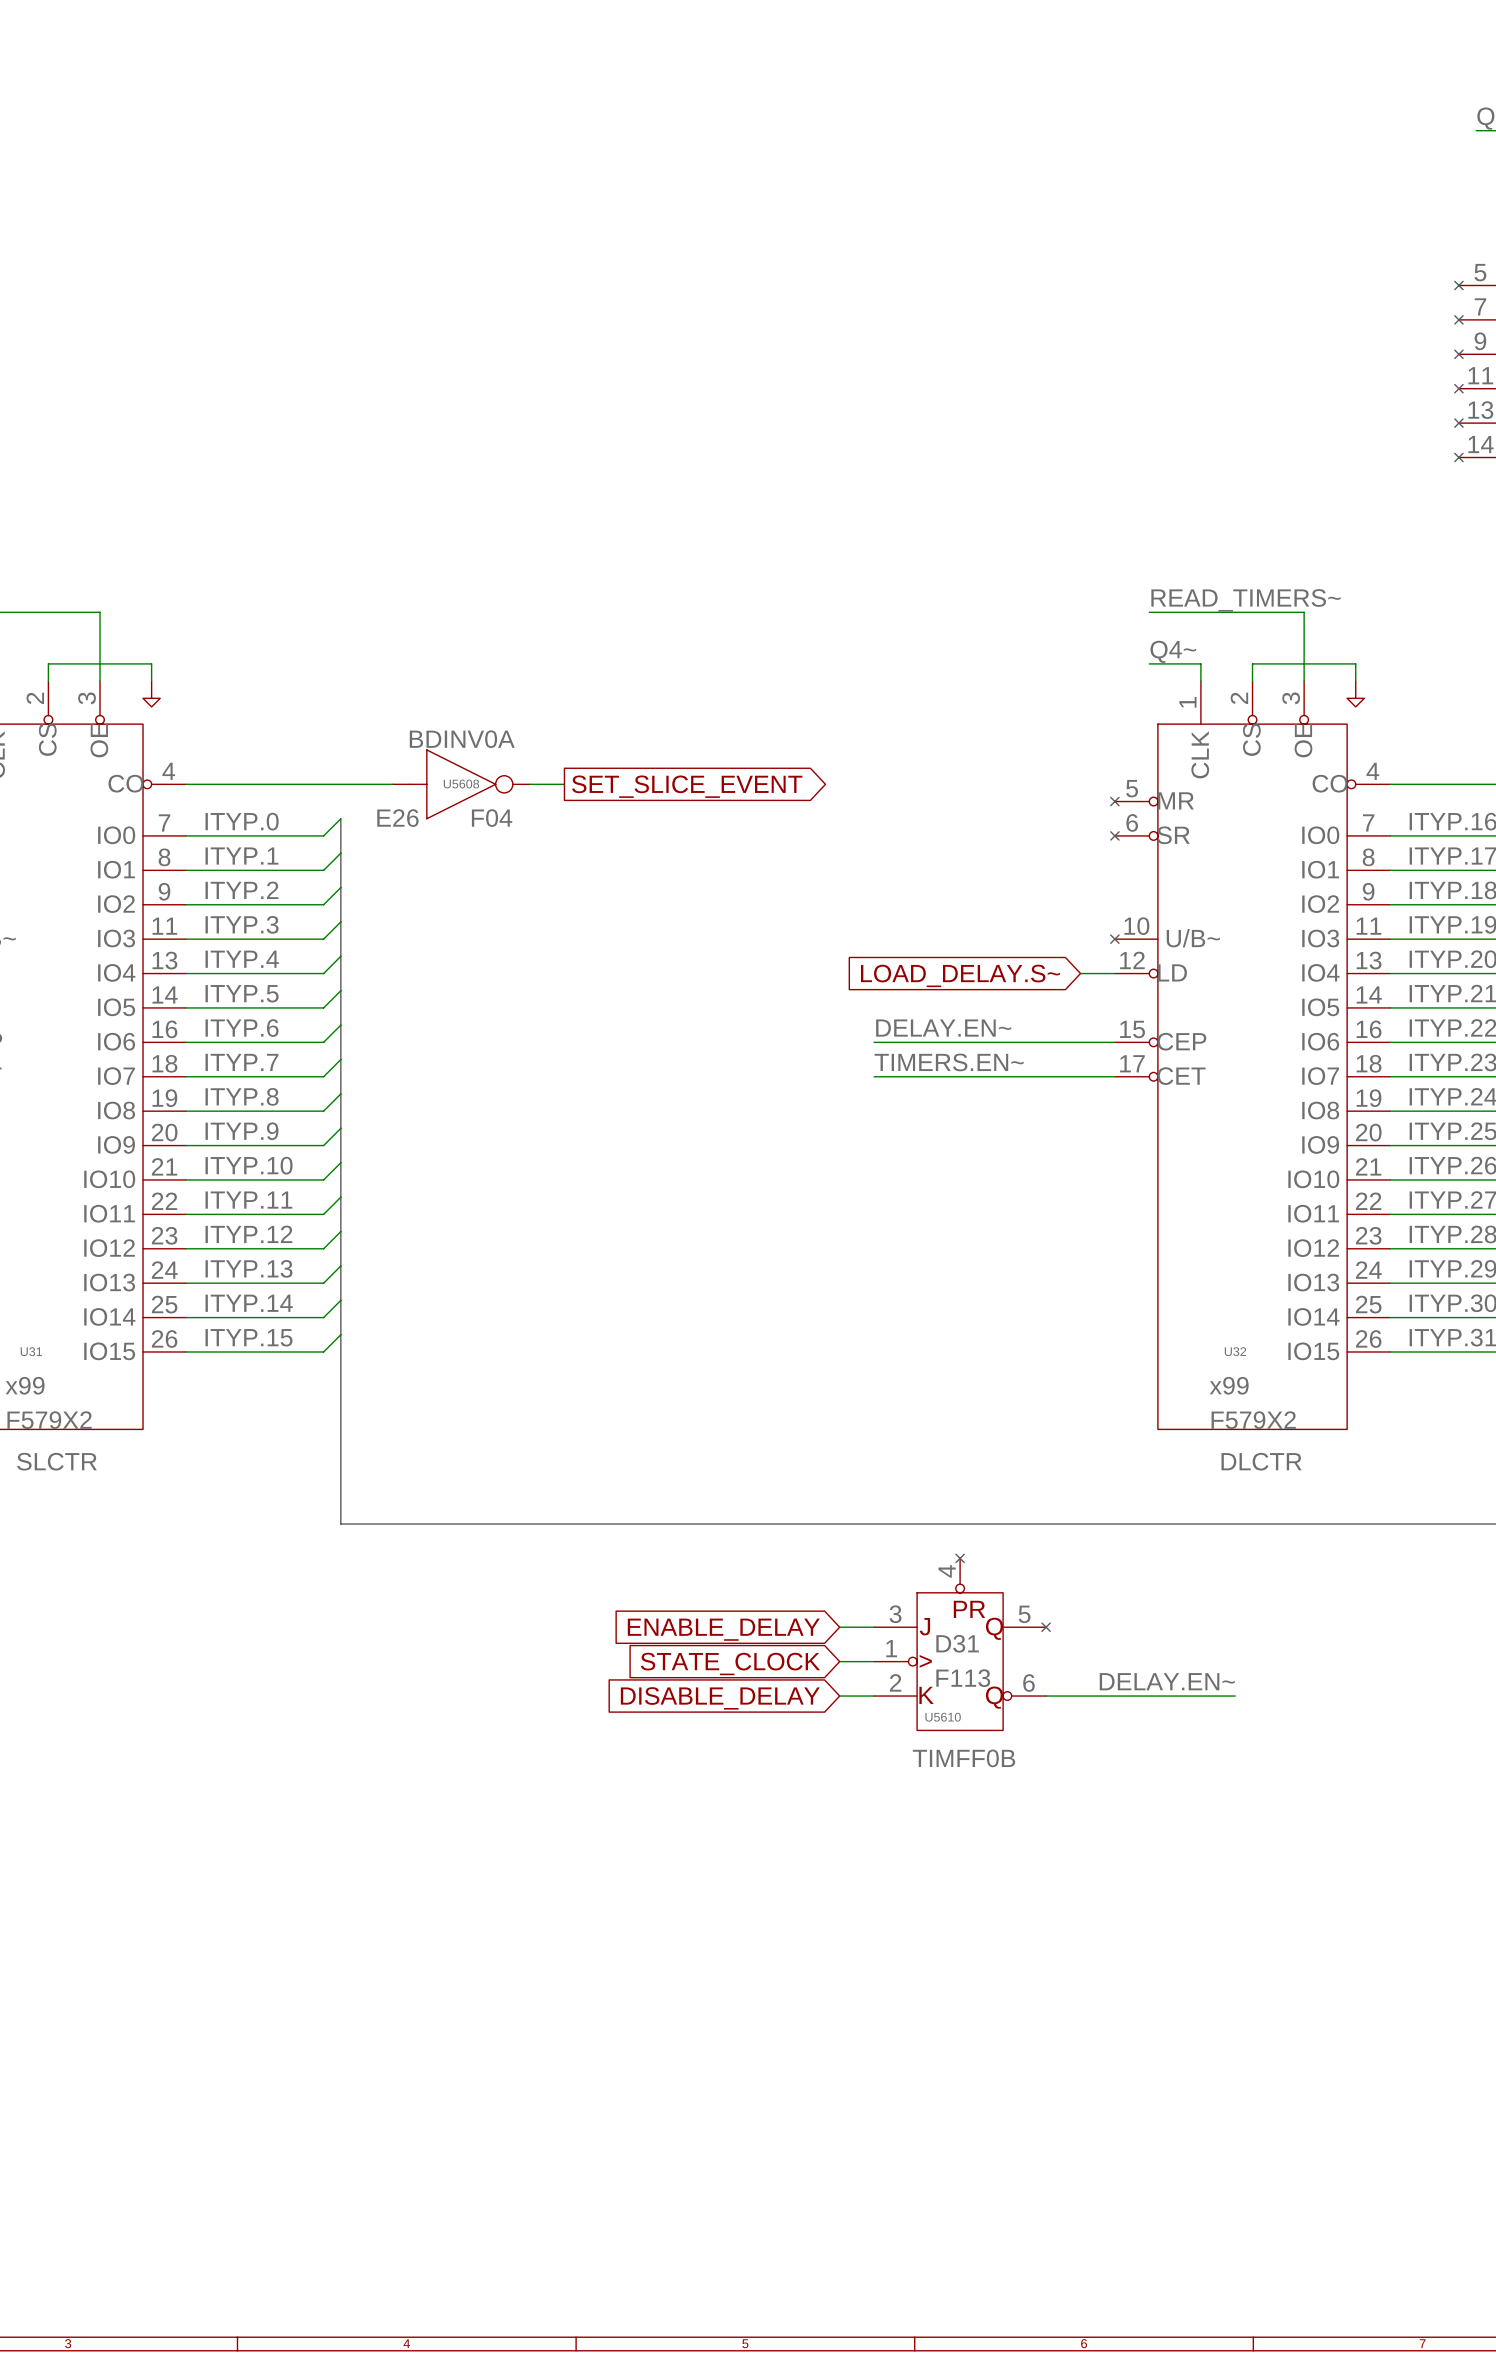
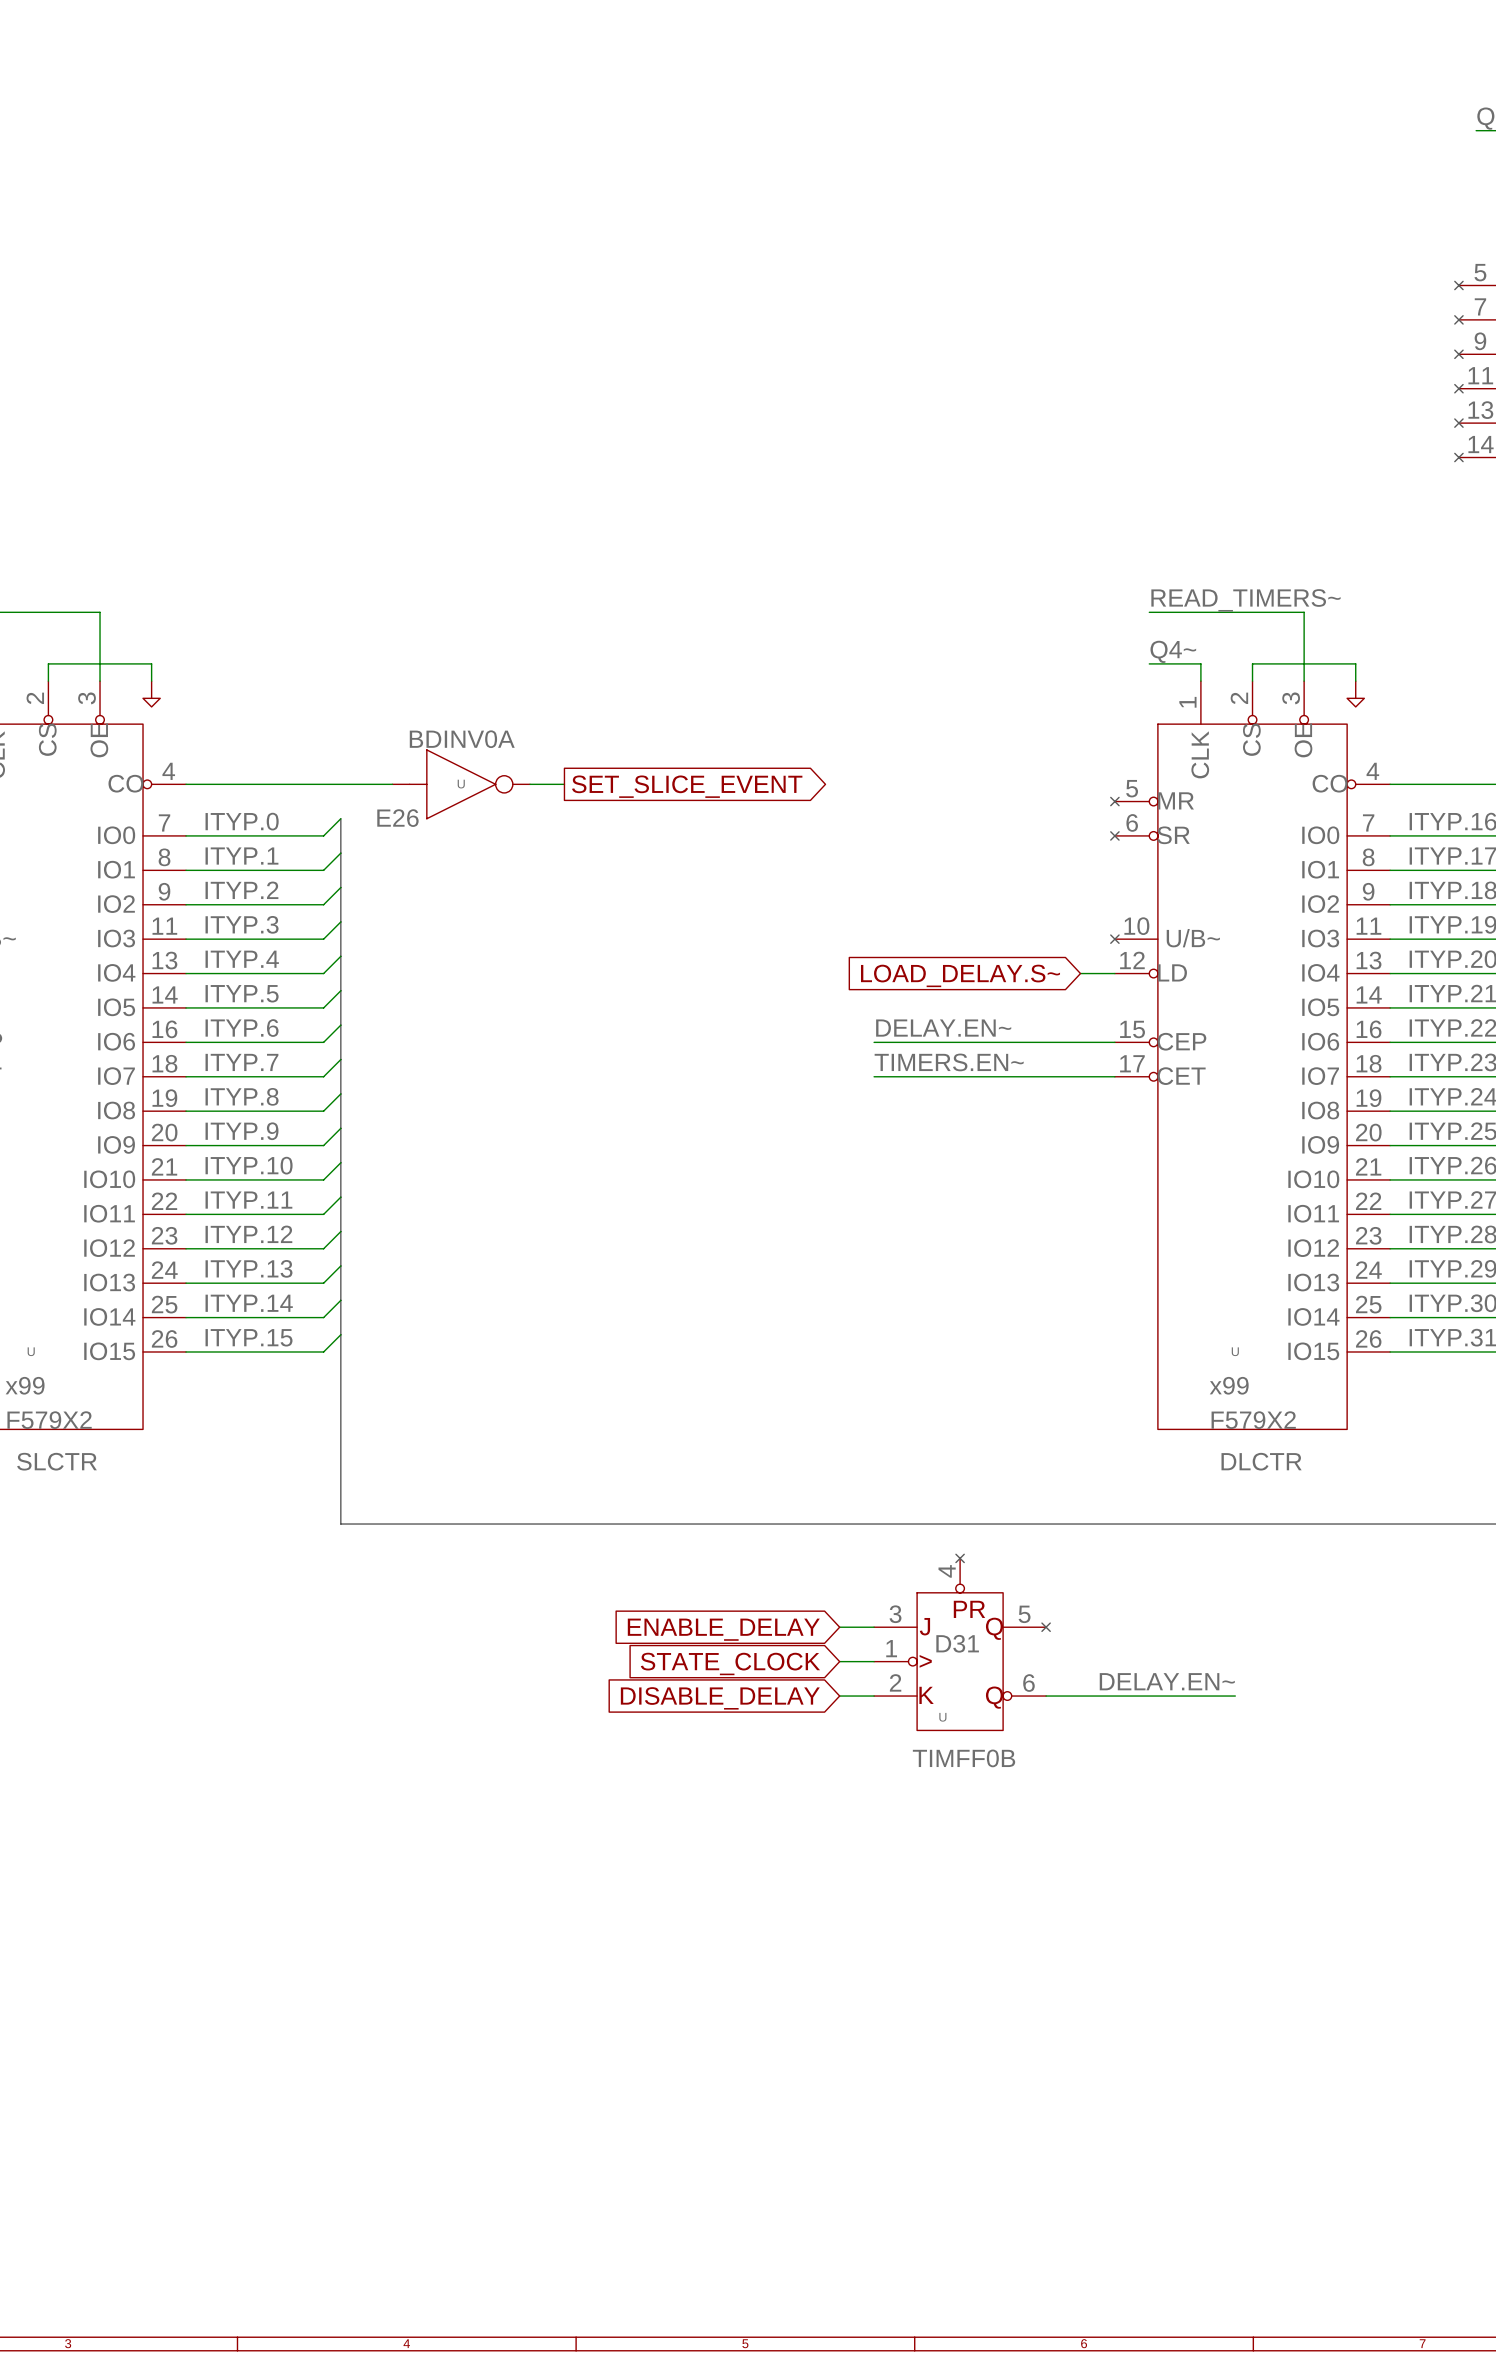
U5608 name: U5608 (461, 784) -> U (461, 784)
U5608 value: F04 (492, 818) -> none
U31 name: U31 (31, 1351) -> U (31, 1351)
U32 name: U32 (1235, 1351) -> U (1235, 1351)
U5610 value: F113 (963, 1678) -> none
U5610 name: U5610 (943, 1717) -> U (942, 1717)

